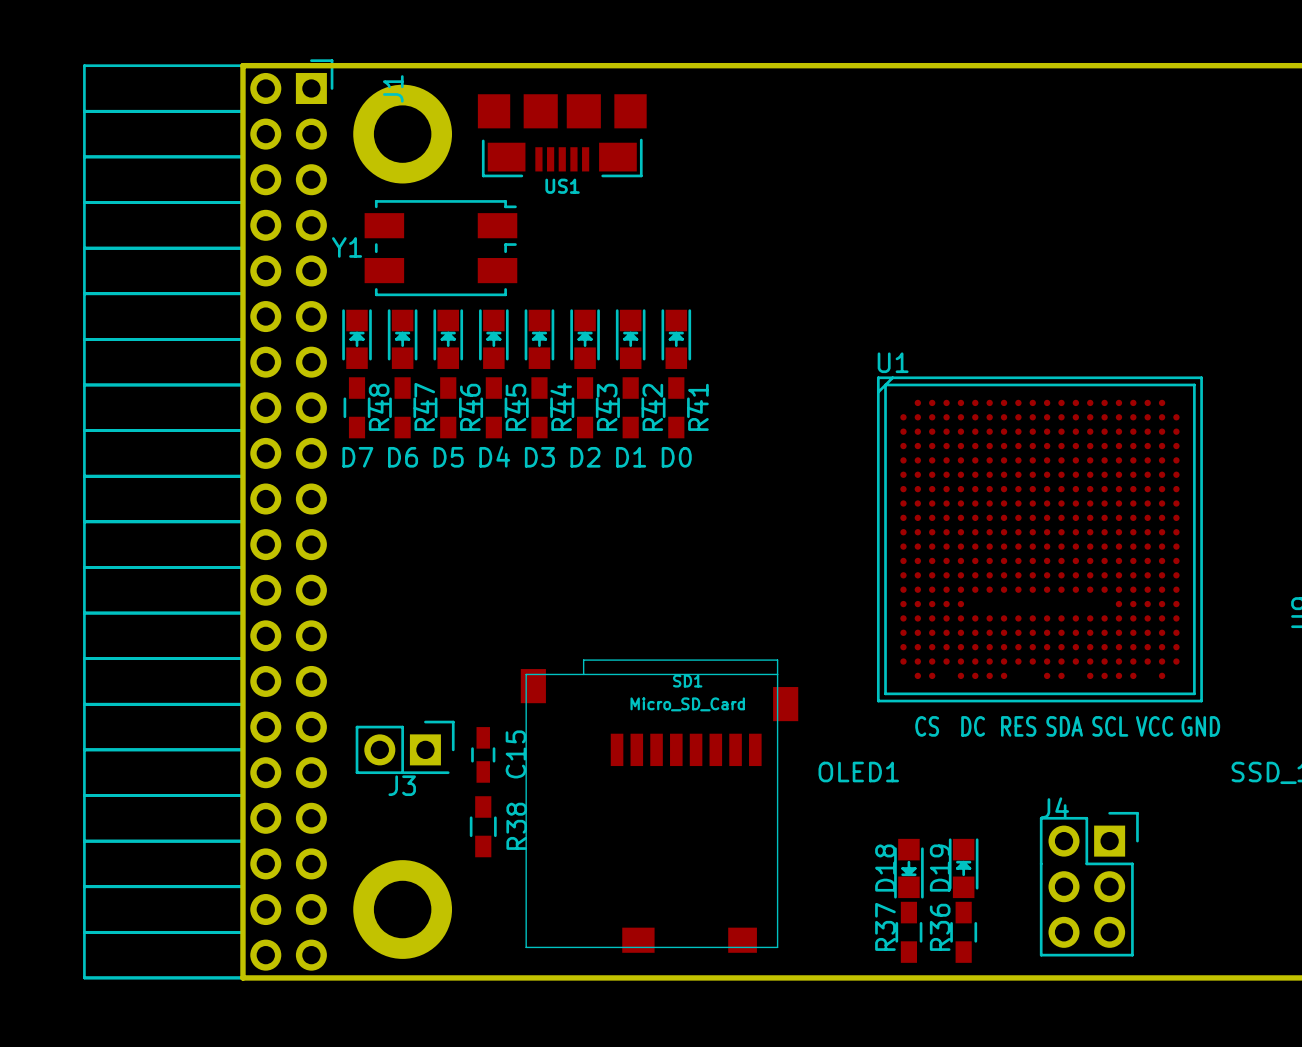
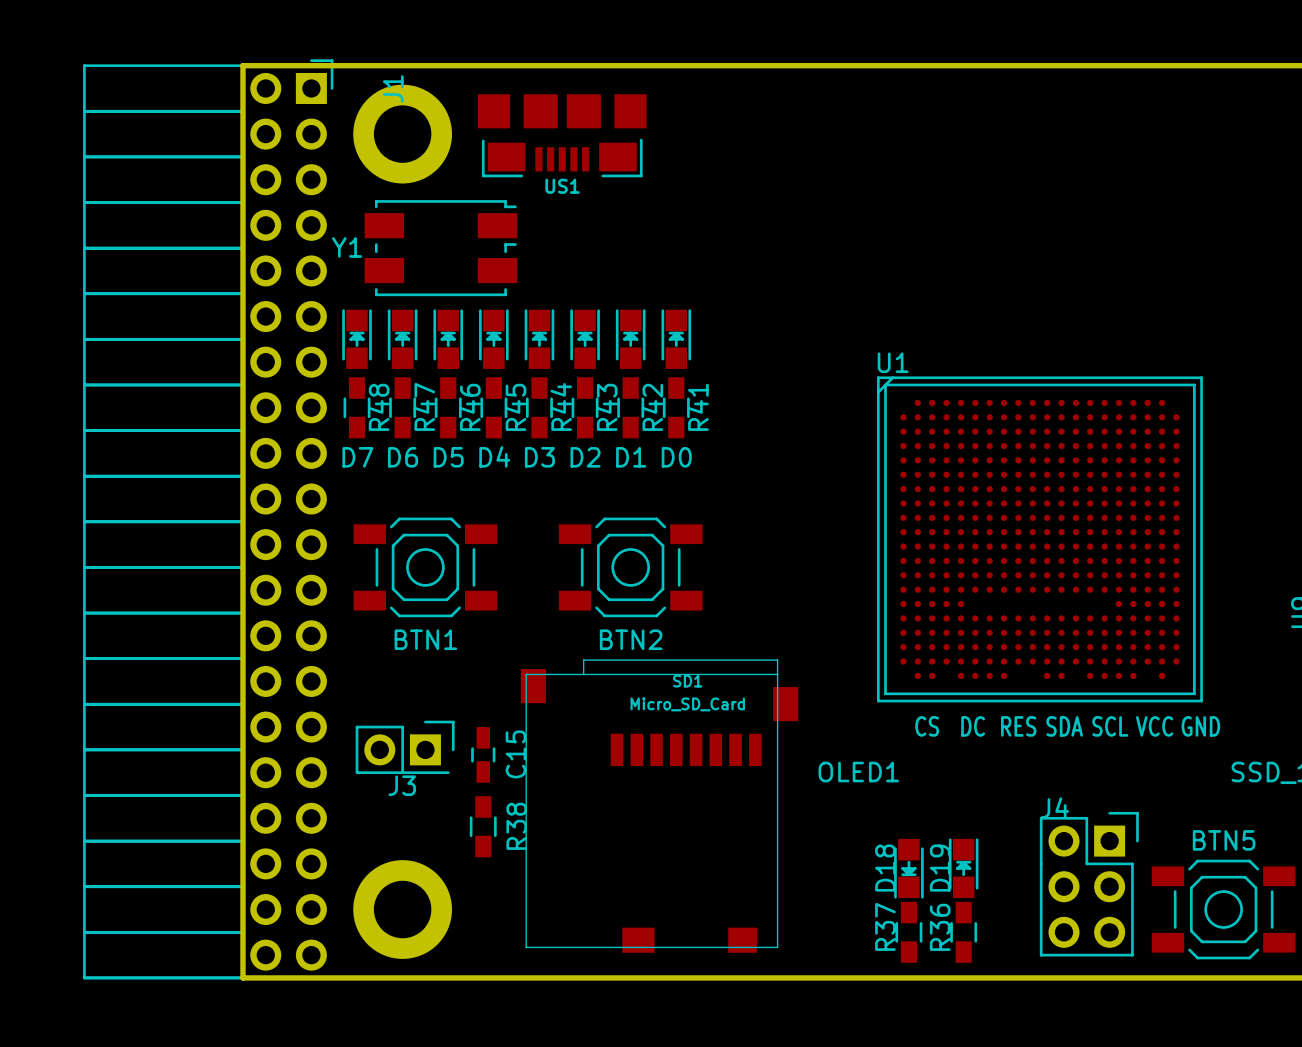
BTN1: none -> (425, 567)
BTN2: none -> (630, 567)
BTN5: none -> (1223, 909)

